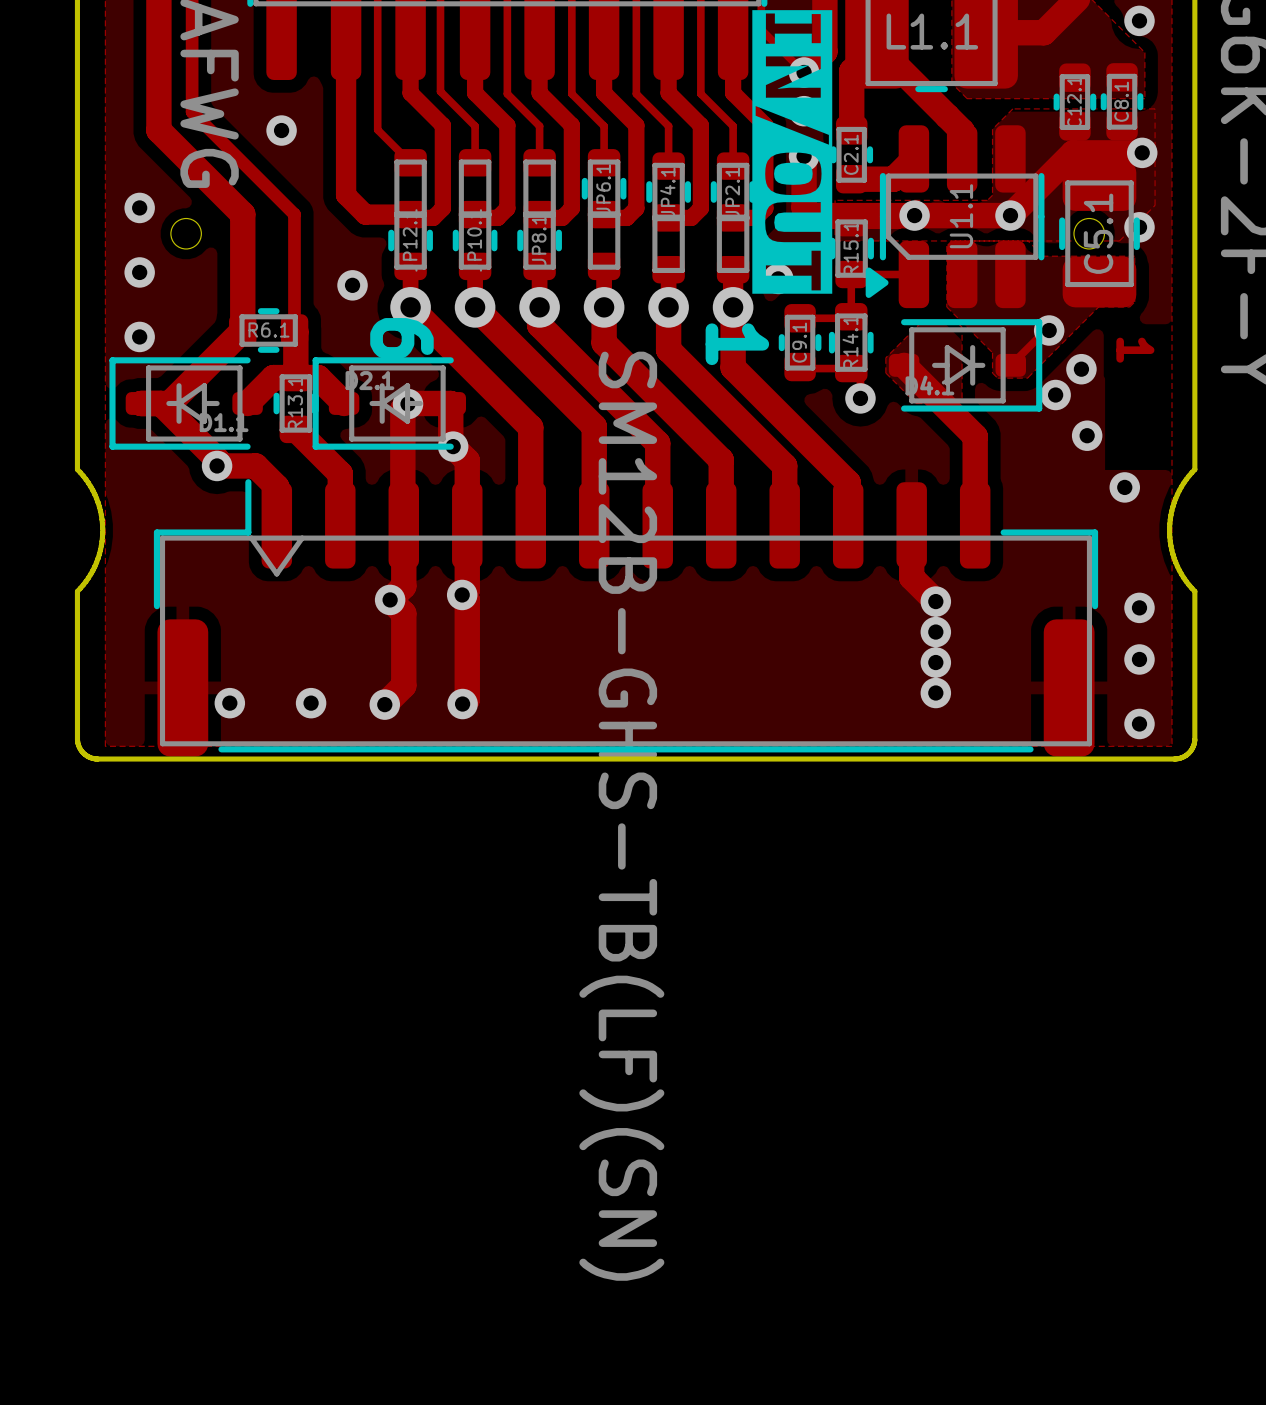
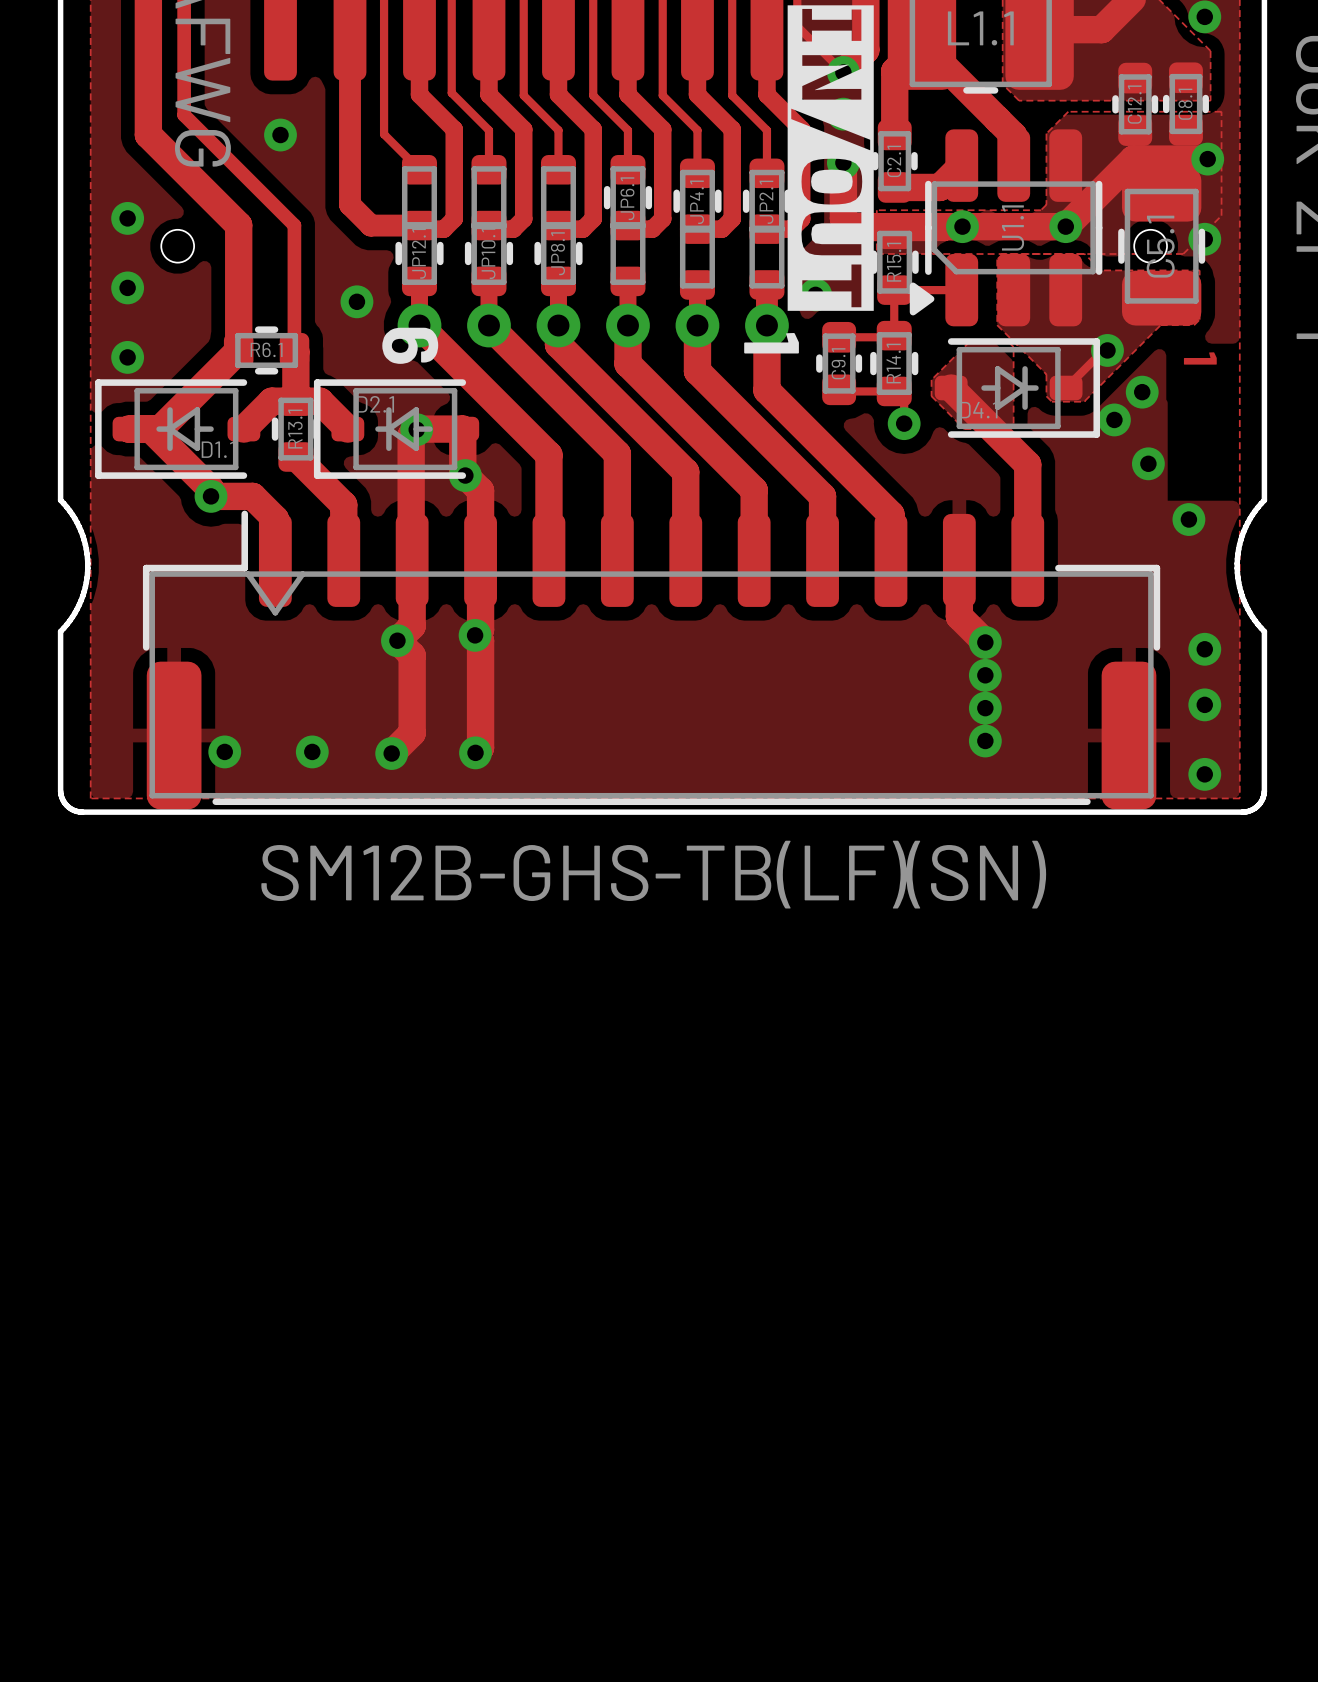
part value rotation: 0° (621, 816) -> 90° counterclockwise (653, 874)

